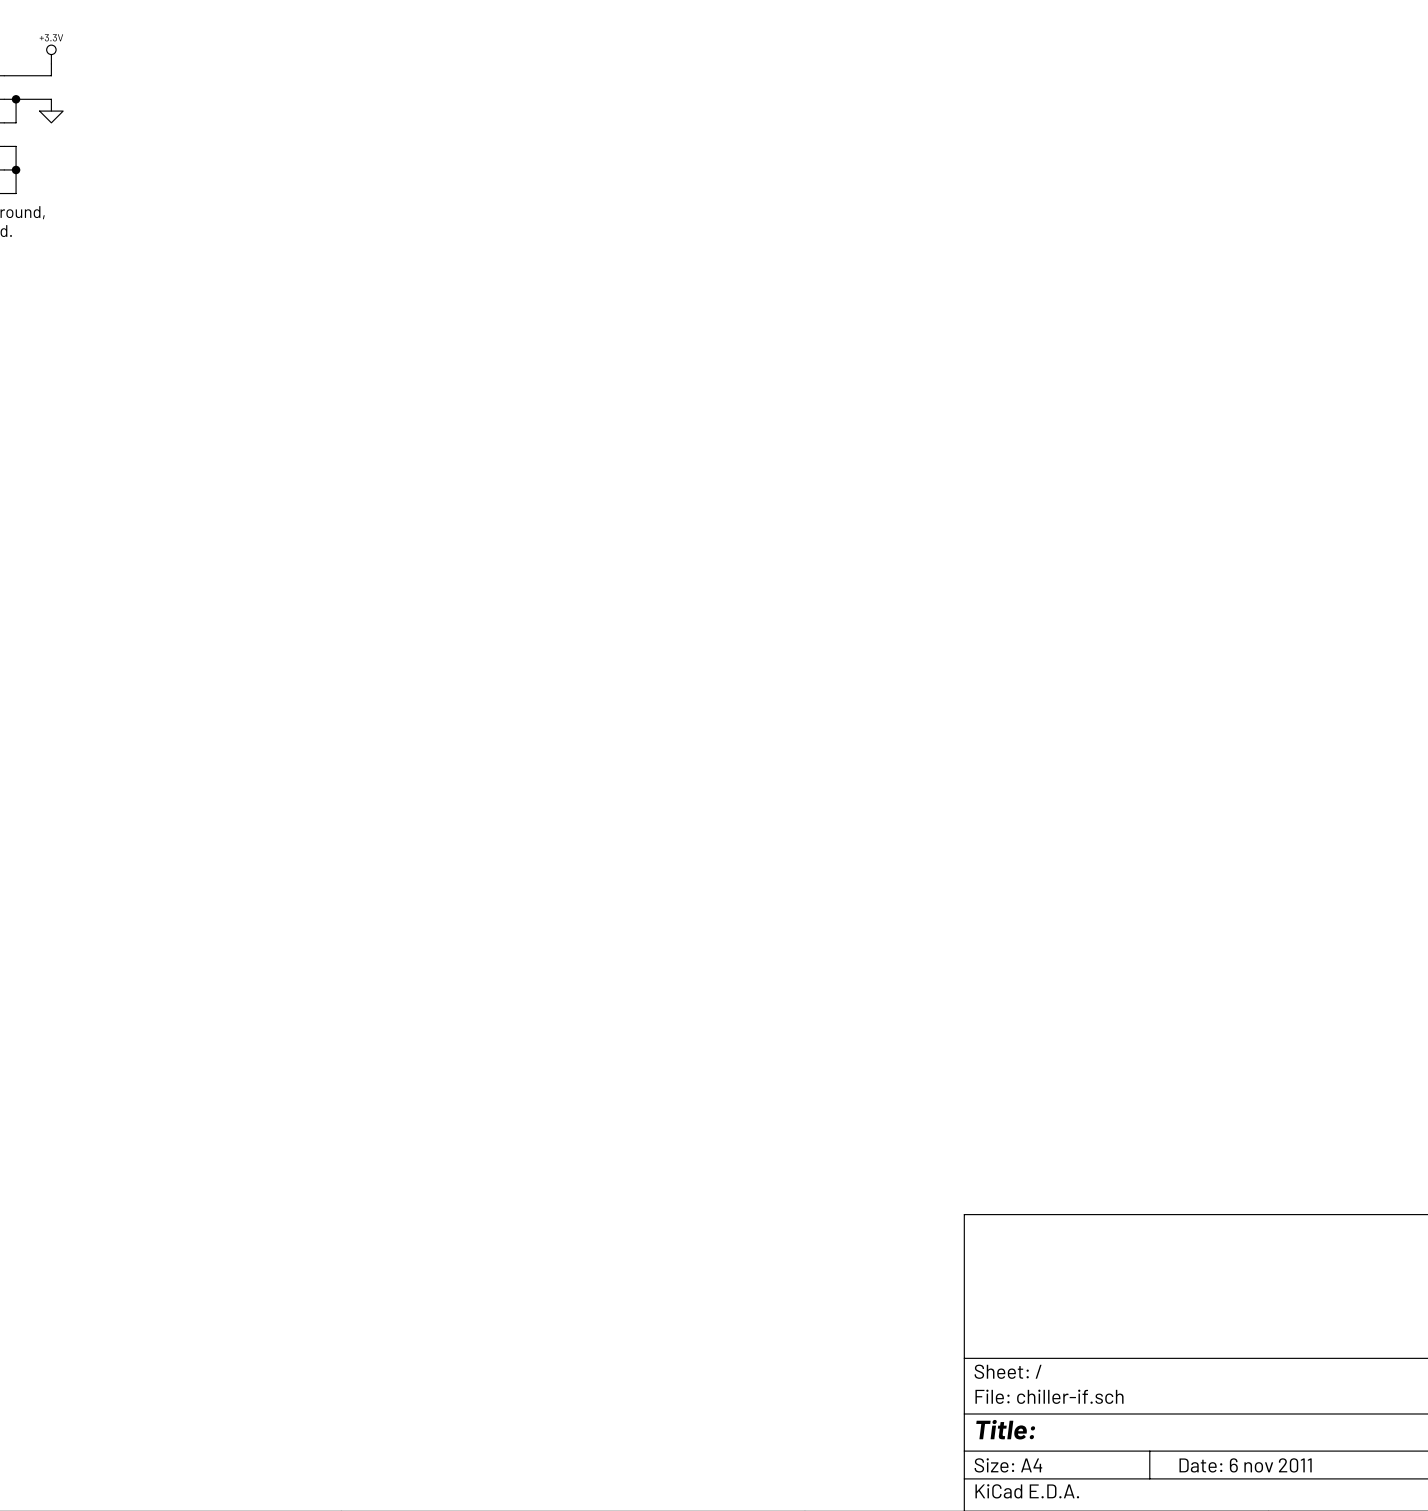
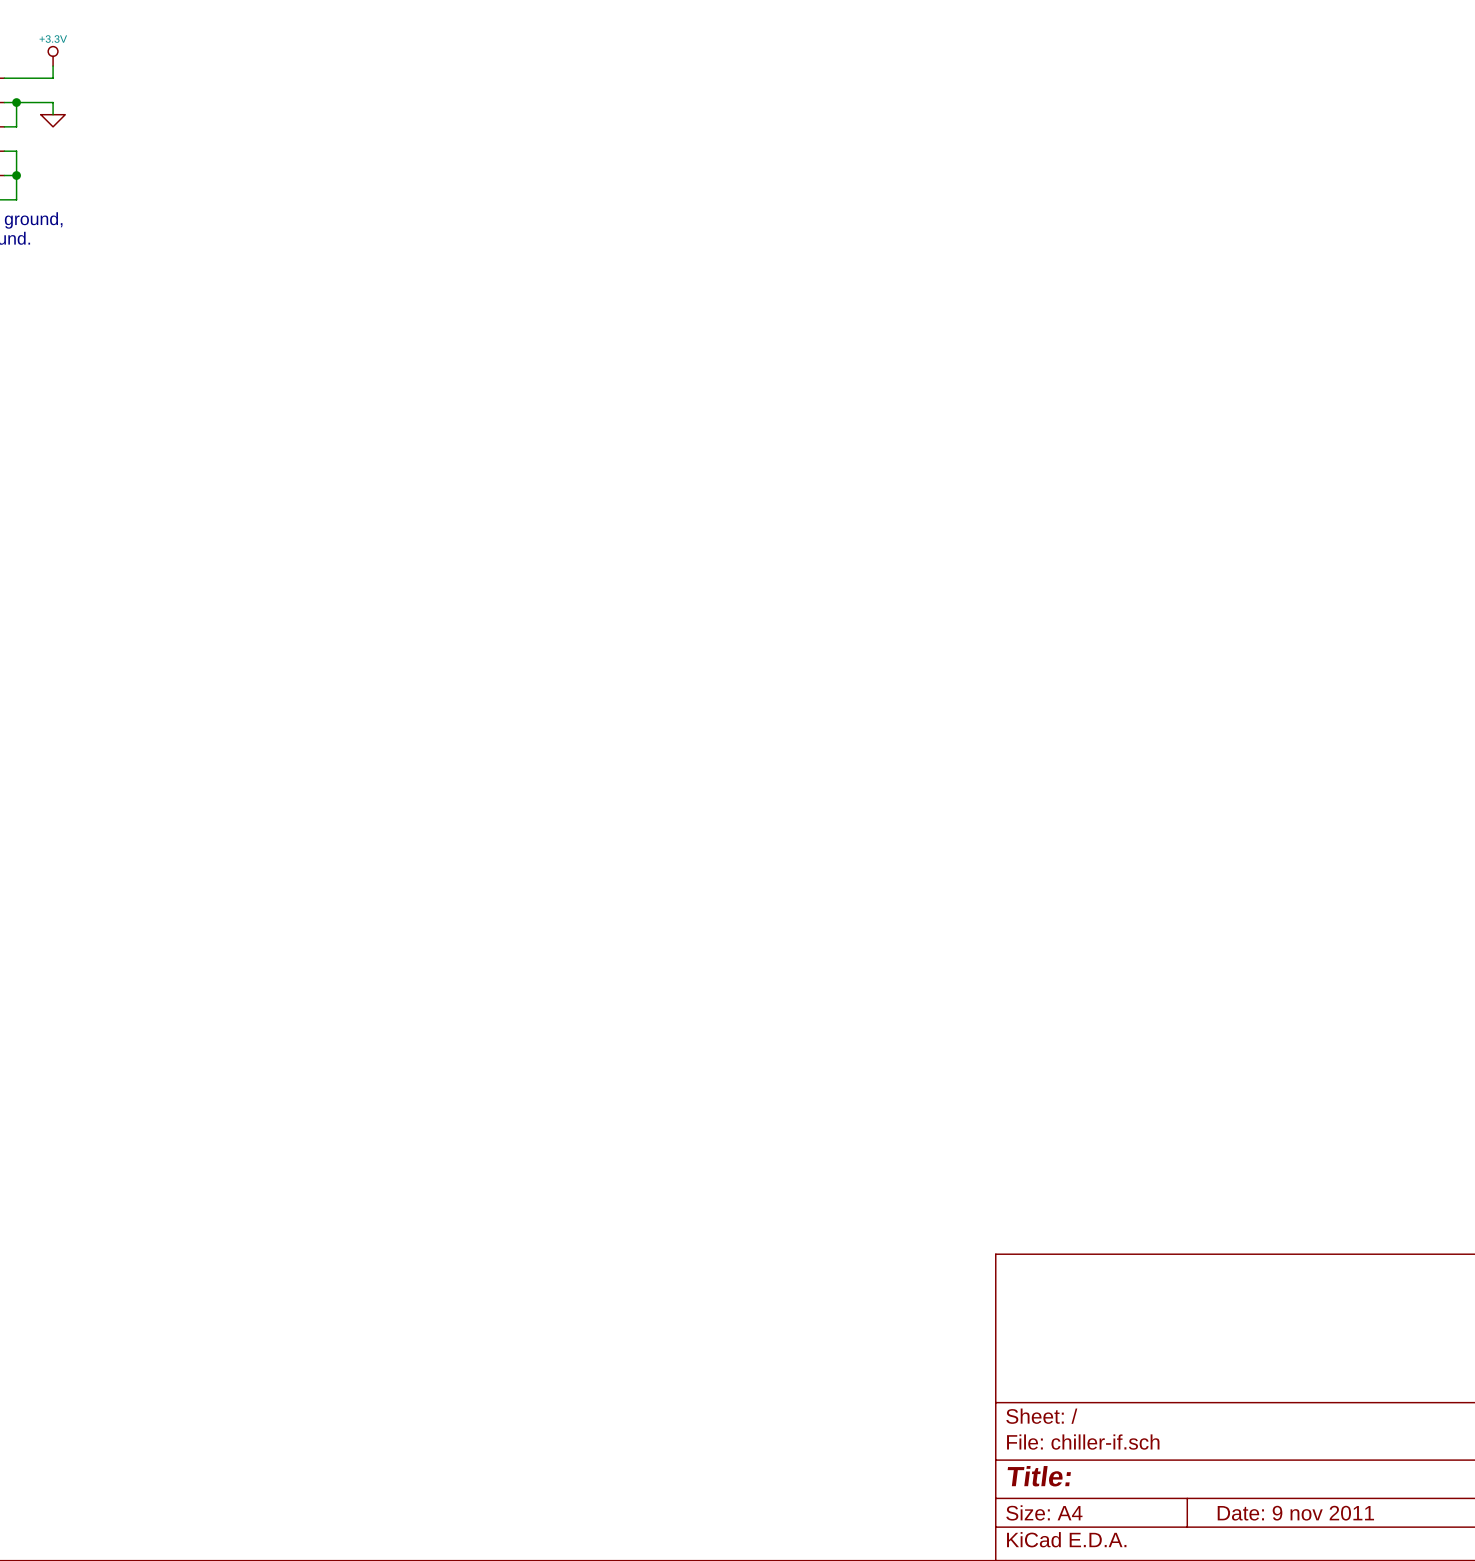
title block: Date: 6 nov 2011 (1245, 1465) -> Date: 9 nov 2011 (1295, 1513)

